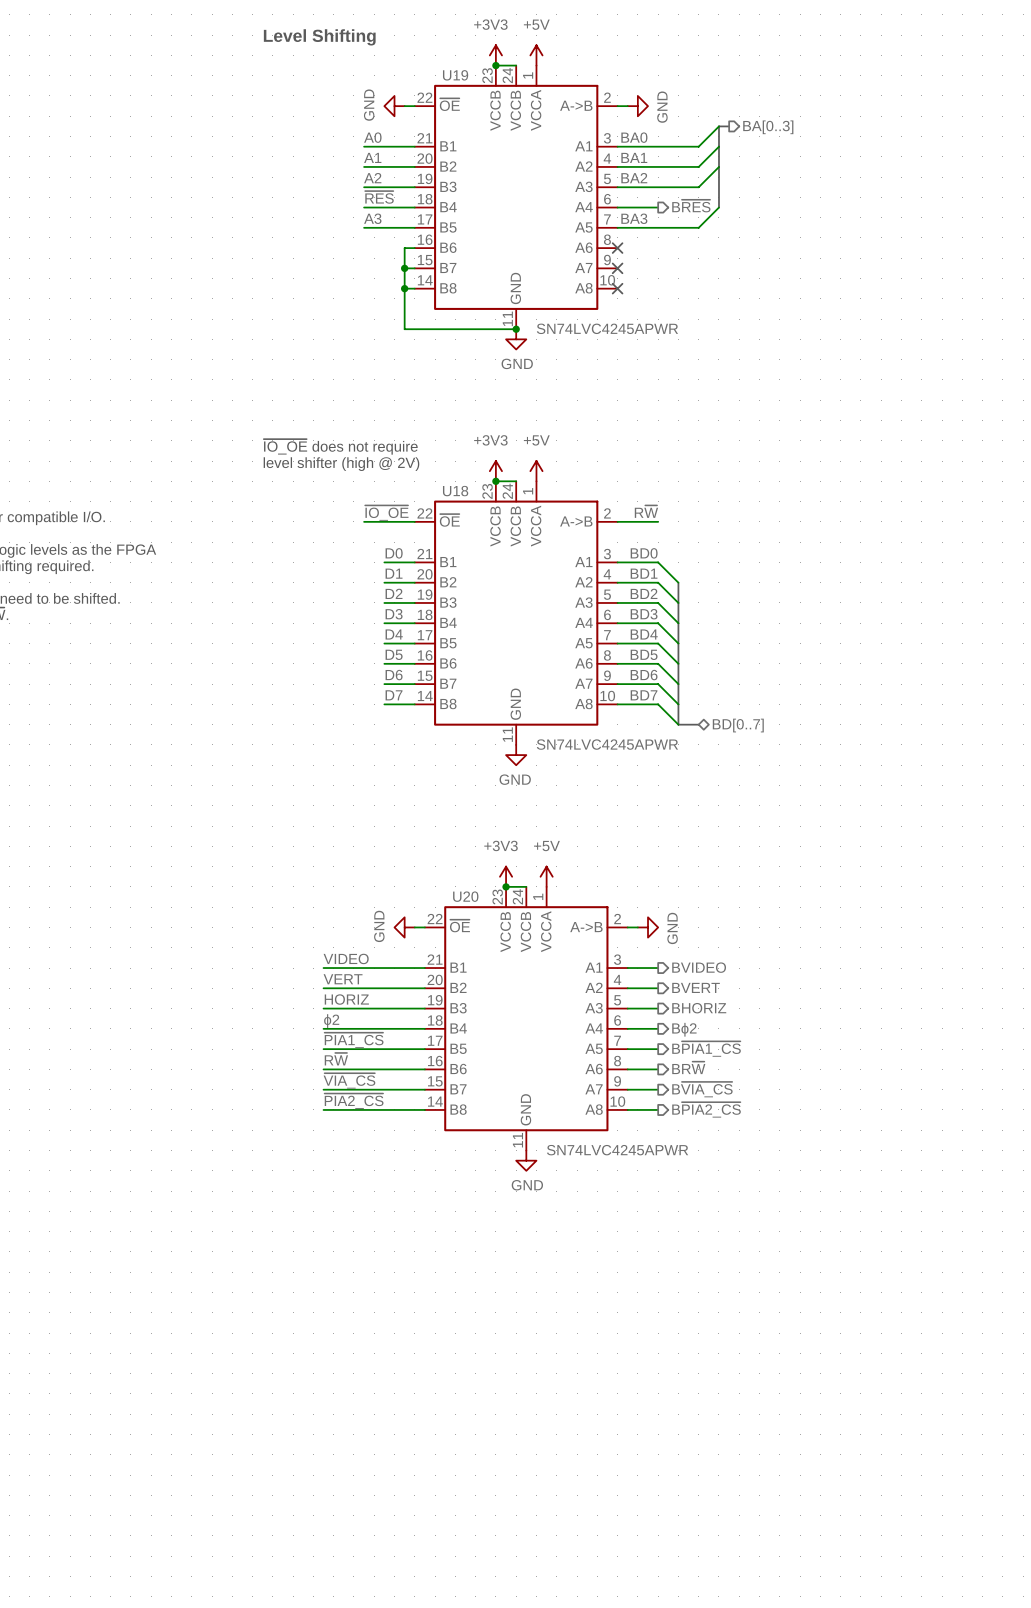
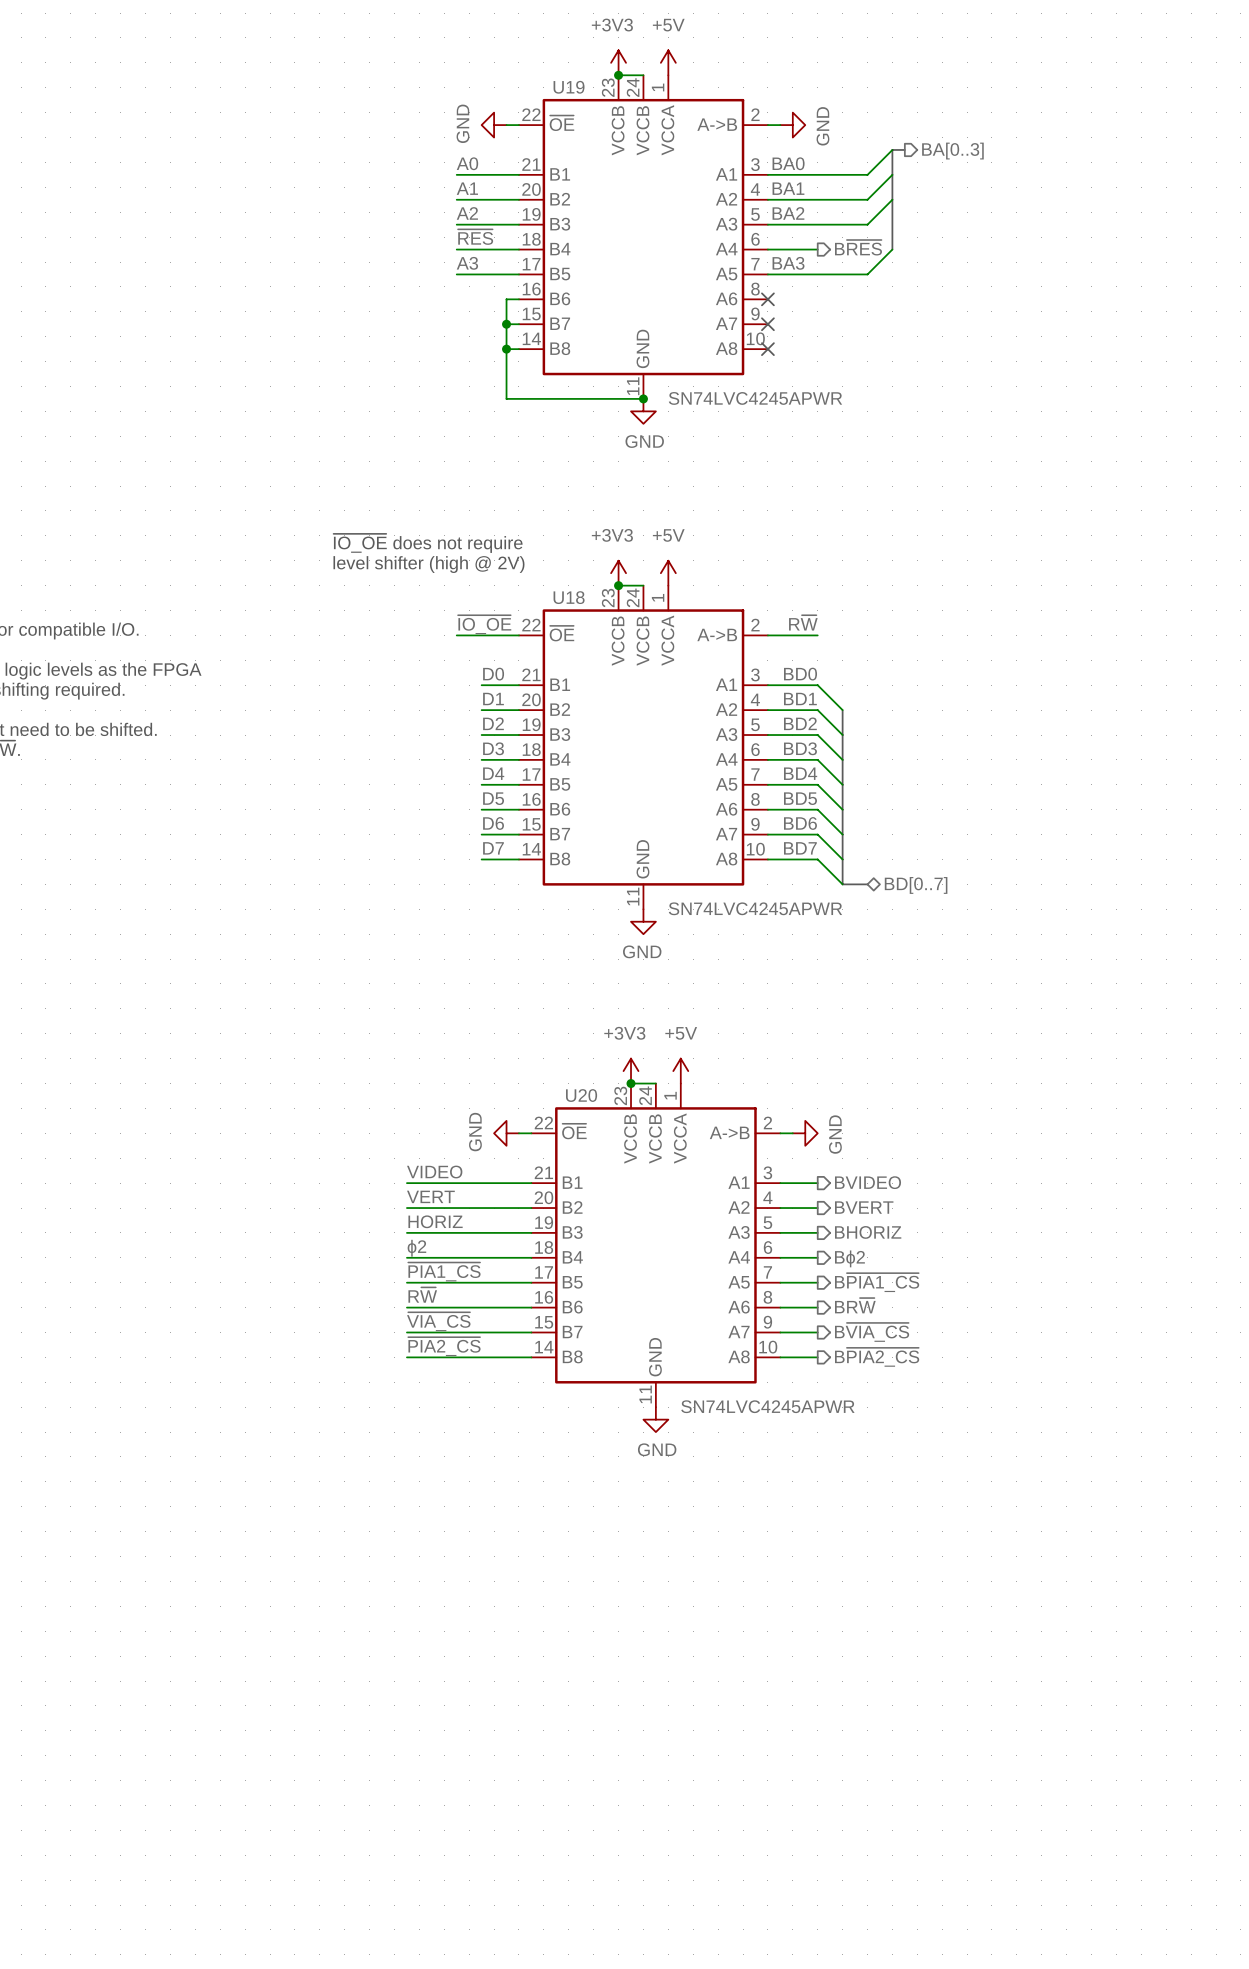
text: Level Shifting (319, 37) -> none

